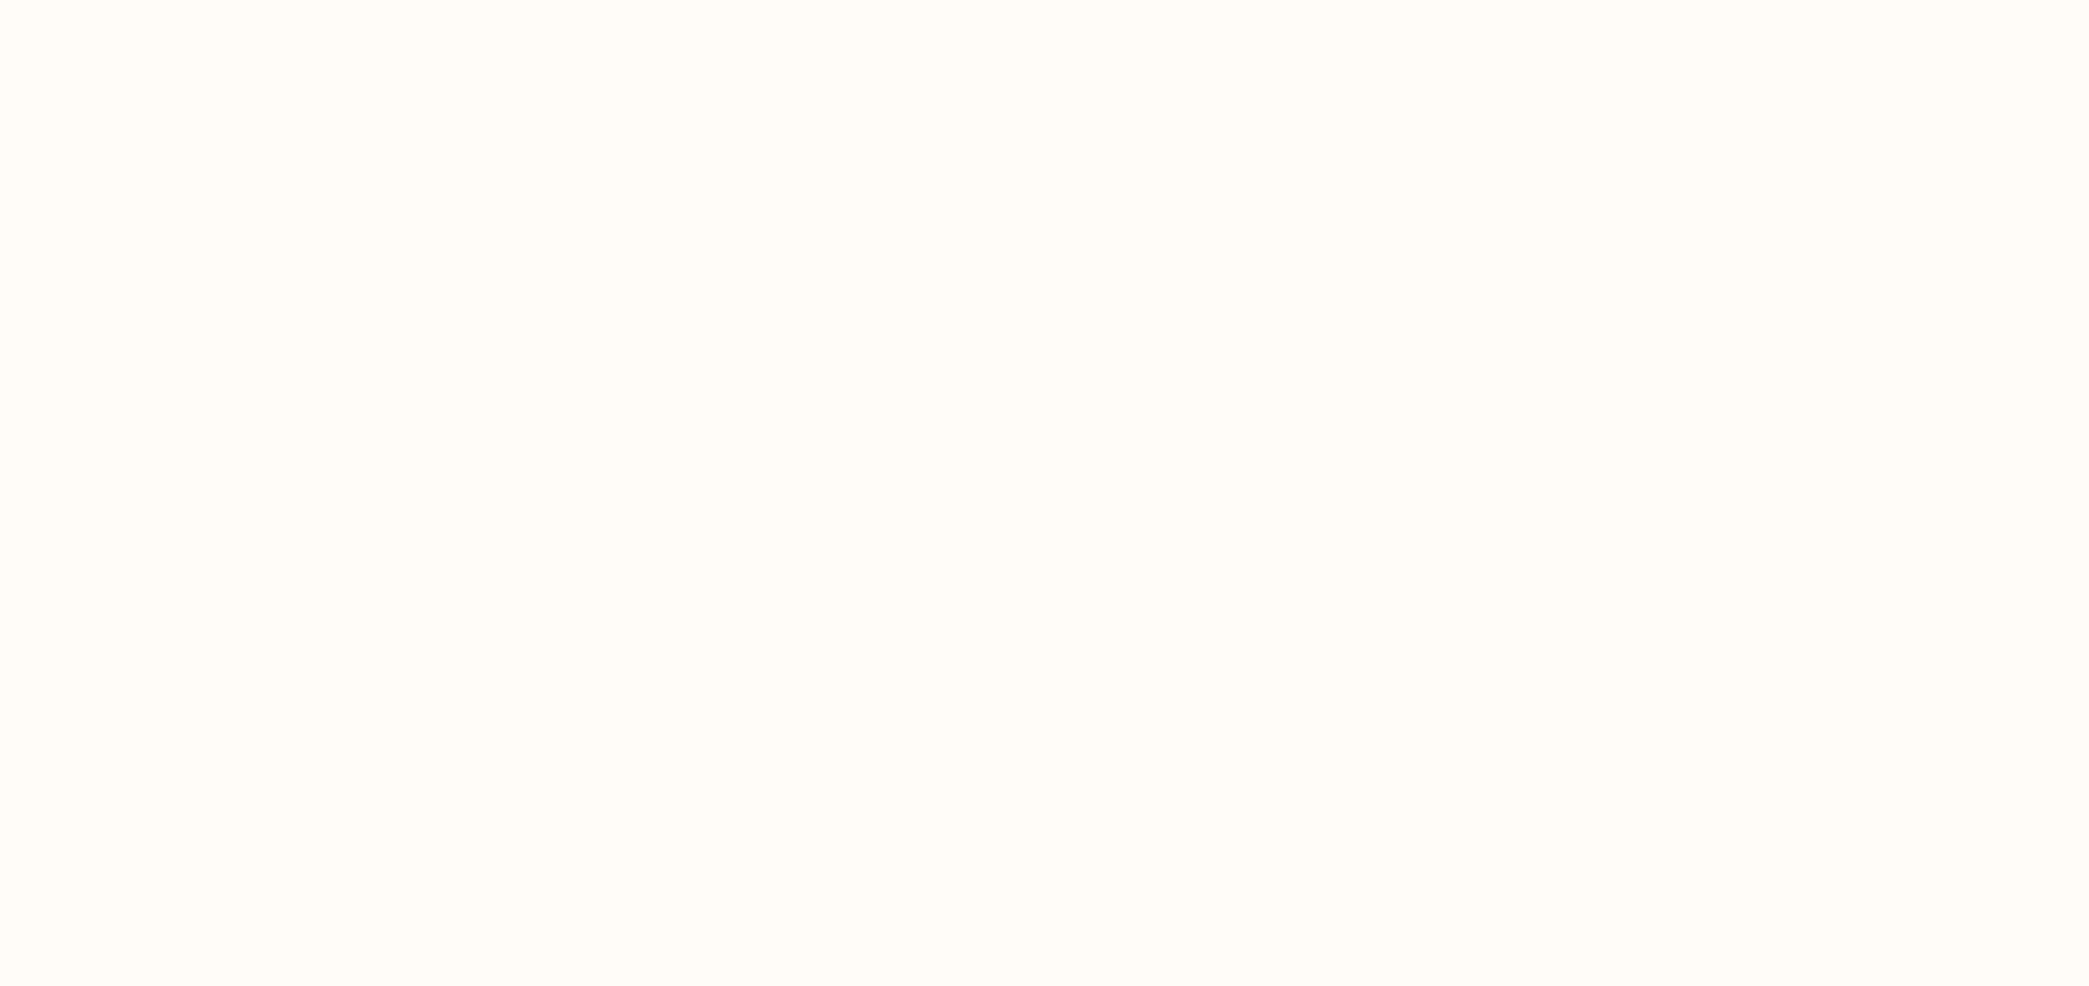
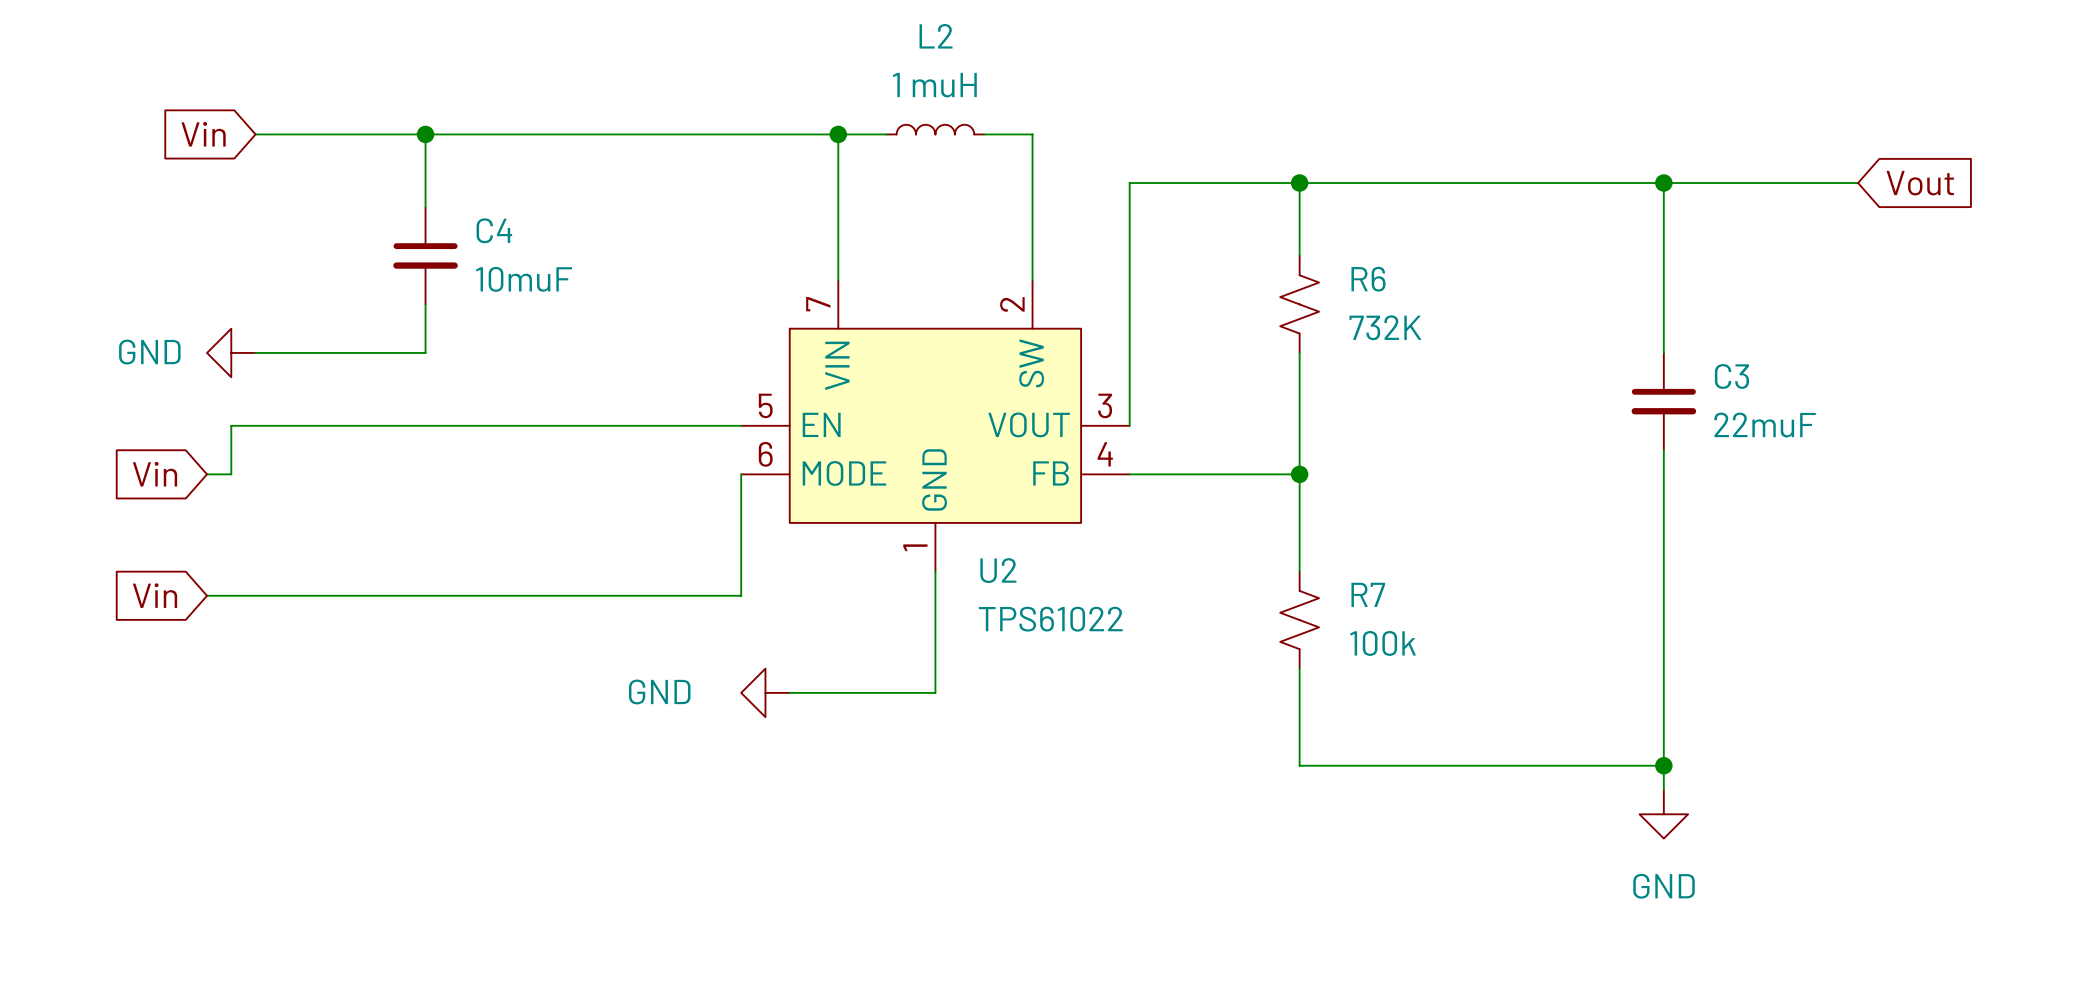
L2: none -> 1 muH (935, 129)
global label: none -> Vin (203, 134)
wire: none -> (255, 134) (886, 134)
wire: none -> (425, 134) (425, 207)
junction: none -> (425, 134)
wire: none -> (838, 134) (838, 280)
junction: none -> (838, 134)
wire: none -> (983, 134) (1032, 134) (1032, 280)
wire: none -> (1299, 183) (1299, 255)
junction: none -> (1299, 183)
wire: none -> (1663, 183) (1663, 352)
junction: none -> (1663, 183)
wire: none -> (1858, 183) (1129, 183) (1129, 425)
global label: none -> Vout (1920, 183)
C4: none -> 10muF (425, 255)
wire: none -> (425, 304) (425, 352) (255, 352)
R6: none -> 732K (1299, 304)
power symbol: none -> GND (231, 352)
wire: none -> (1299, 352) (1299, 571)
C3: none -> 22muF (1663, 401)
wire: none -> (741, 425) (231, 425) (231, 474) (207, 474)
U2: none -> TPS61022 (935, 425)
wire: none -> (1663, 450) (1663, 790)
global label: none -> Vin (155, 474)
wire: none -> (741, 474) (741, 595) (207, 595)
wire: none -> (1129, 474) (1299, 474)
junction: none -> (1299, 474)
wire: none -> (935, 571) (935, 692) (789, 692)
global label: none -> Vin (155, 595)
R7: none -> 100k (1299, 620)
wire: none -> (1299, 668) (1299, 765) (1663, 765)
power symbol: none -> GND (765, 692)
junction: none -> (1663, 765)
power symbol: none -> GND (1663, 814)

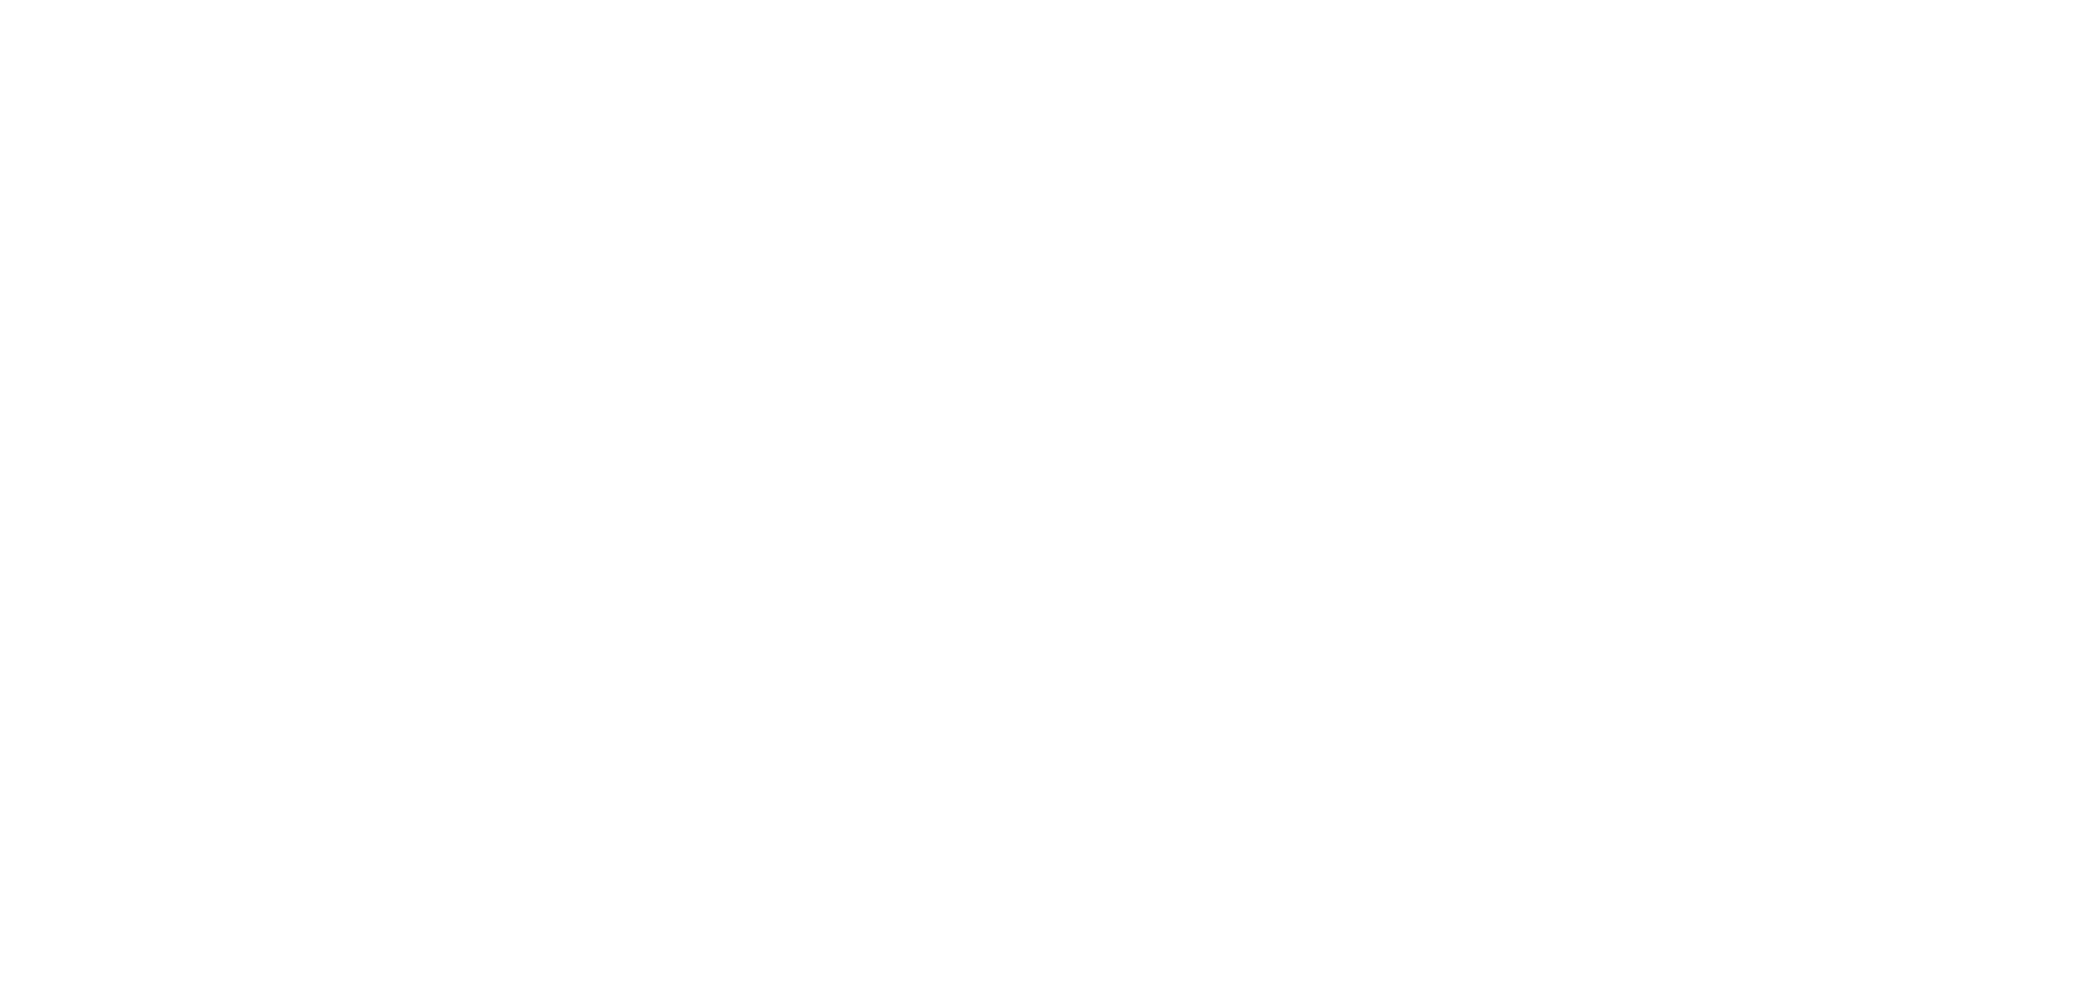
L2: 1 muH (935, 129) -> none
global label: Vin (203, 134) -> none
wire: (255, 134) (886, 134) -> none
wire: (425, 134) (425, 207) -> none
junction: (425, 134) -> none
wire: (838, 134) (838, 280) -> none
junction: (838, 134) -> none
wire: (983, 134) (1032, 134) (1032, 280) -> none
wire: (1299, 183) (1299, 255) -> none
junction: (1299, 183) -> none
wire: (1663, 183) (1663, 352) -> none
junction: (1663, 183) -> none
wire: (1858, 183) (1129, 183) (1129, 425) -> none
global label: Vout (1920, 183) -> none
C4: 10muF (425, 255) -> none
wire: (425, 304) (425, 352) (255, 352) -> none
R6: 732K (1299, 304) -> none
power symbol: GND (231, 352) -> none
wire: (1299, 352) (1299, 571) -> none
C3: 22muF (1663, 401) -> none
wire: (741, 425) (231, 425) (231, 474) (207, 474) -> none
U2: TPS61022 (935, 425) -> none
wire: (1663, 450) (1663, 790) -> none
global label: Vin (155, 474) -> none
wire: (741, 474) (741, 595) (207, 595) -> none
wire: (1129, 474) (1299, 474) -> none
junction: (1299, 474) -> none
wire: (935, 571) (935, 692) (789, 692) -> none
global label: Vin (155, 595) -> none
R7: 100k (1299, 620) -> none
wire: (1299, 668) (1299, 765) (1663, 765) -> none
power symbol: GND (765, 692) -> none
junction: (1663, 765) -> none
power symbol: GND (1663, 814) -> none

